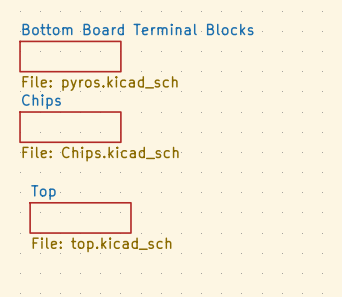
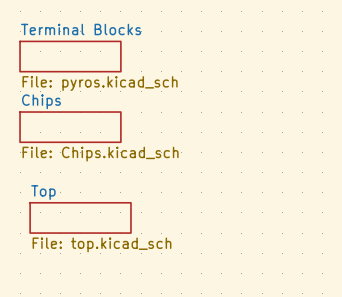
sheet Bottom Board Terminal Blocks name: Bottom Board Terminal Blocks (138, 29) -> Terminal Blocks (81, 29)

